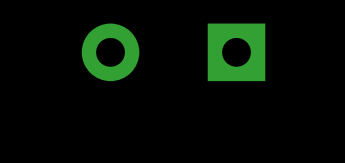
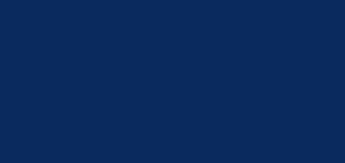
part: (173, 52) -> none

